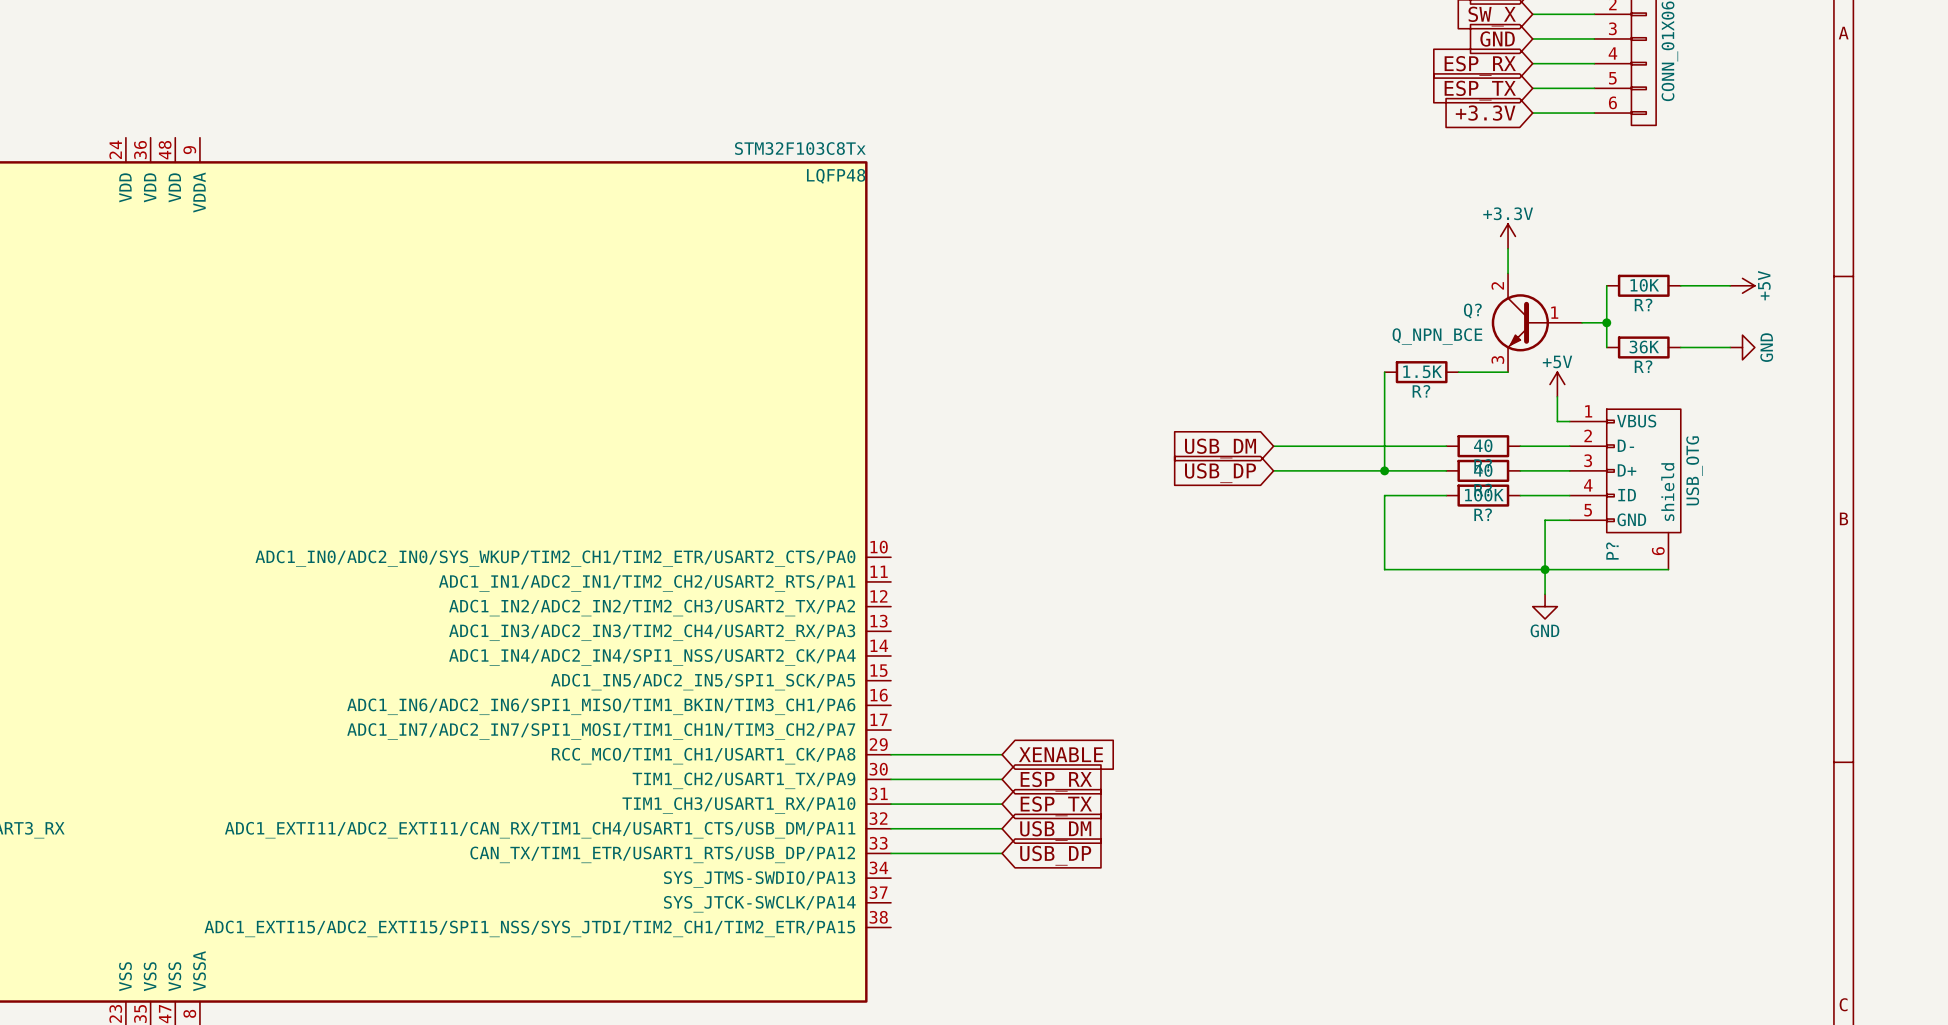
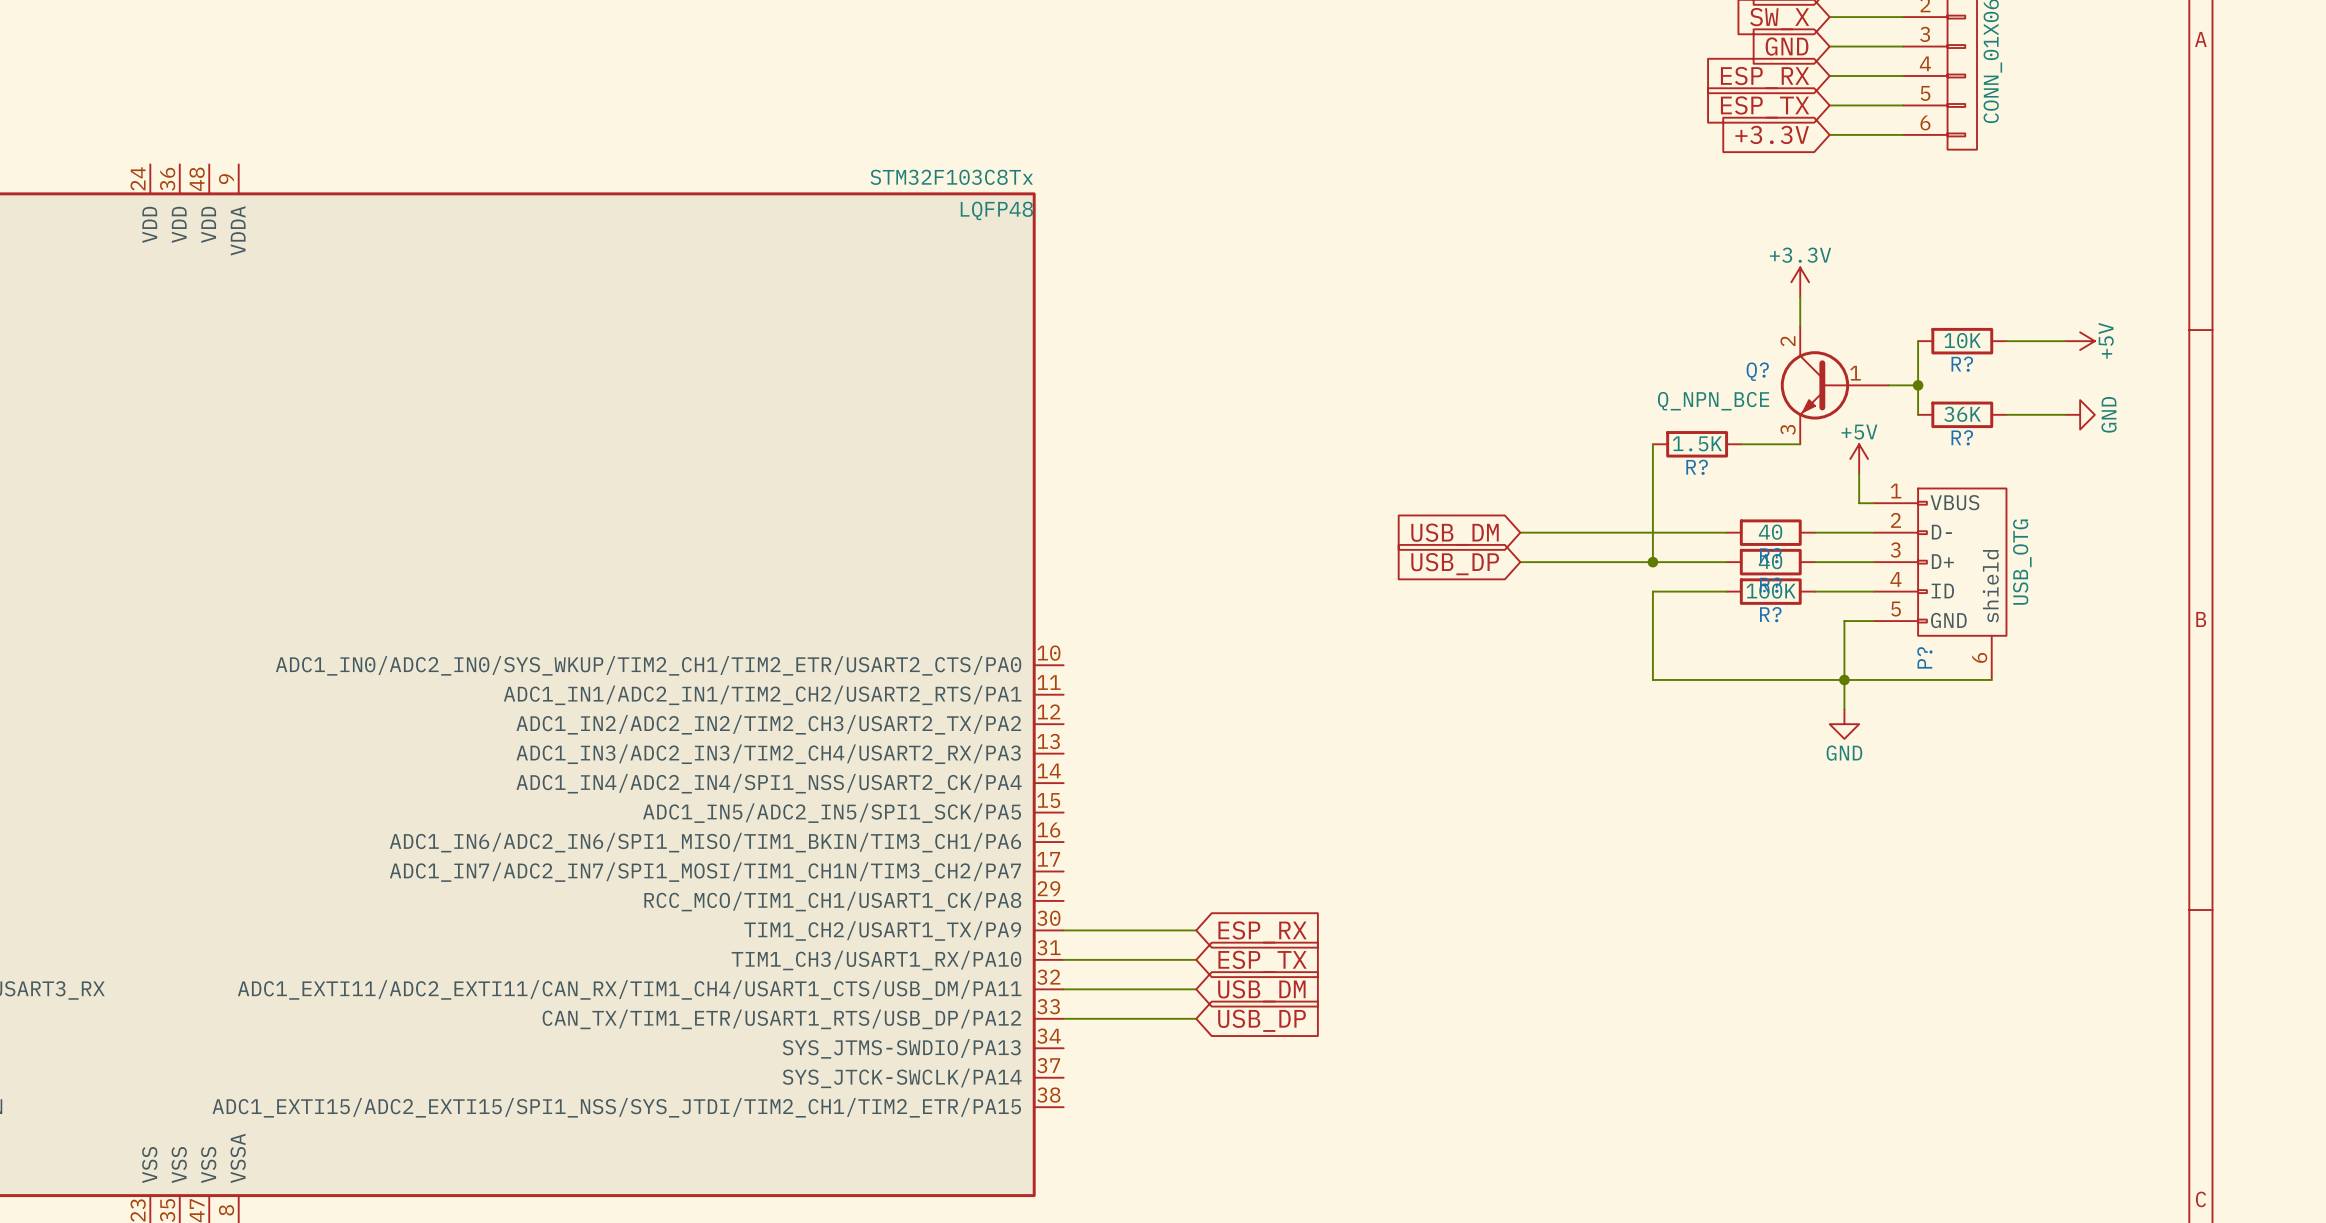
wire: (891, 754) (1002, 754) -> none
global label: XENABLE (1060, 754) -> none

